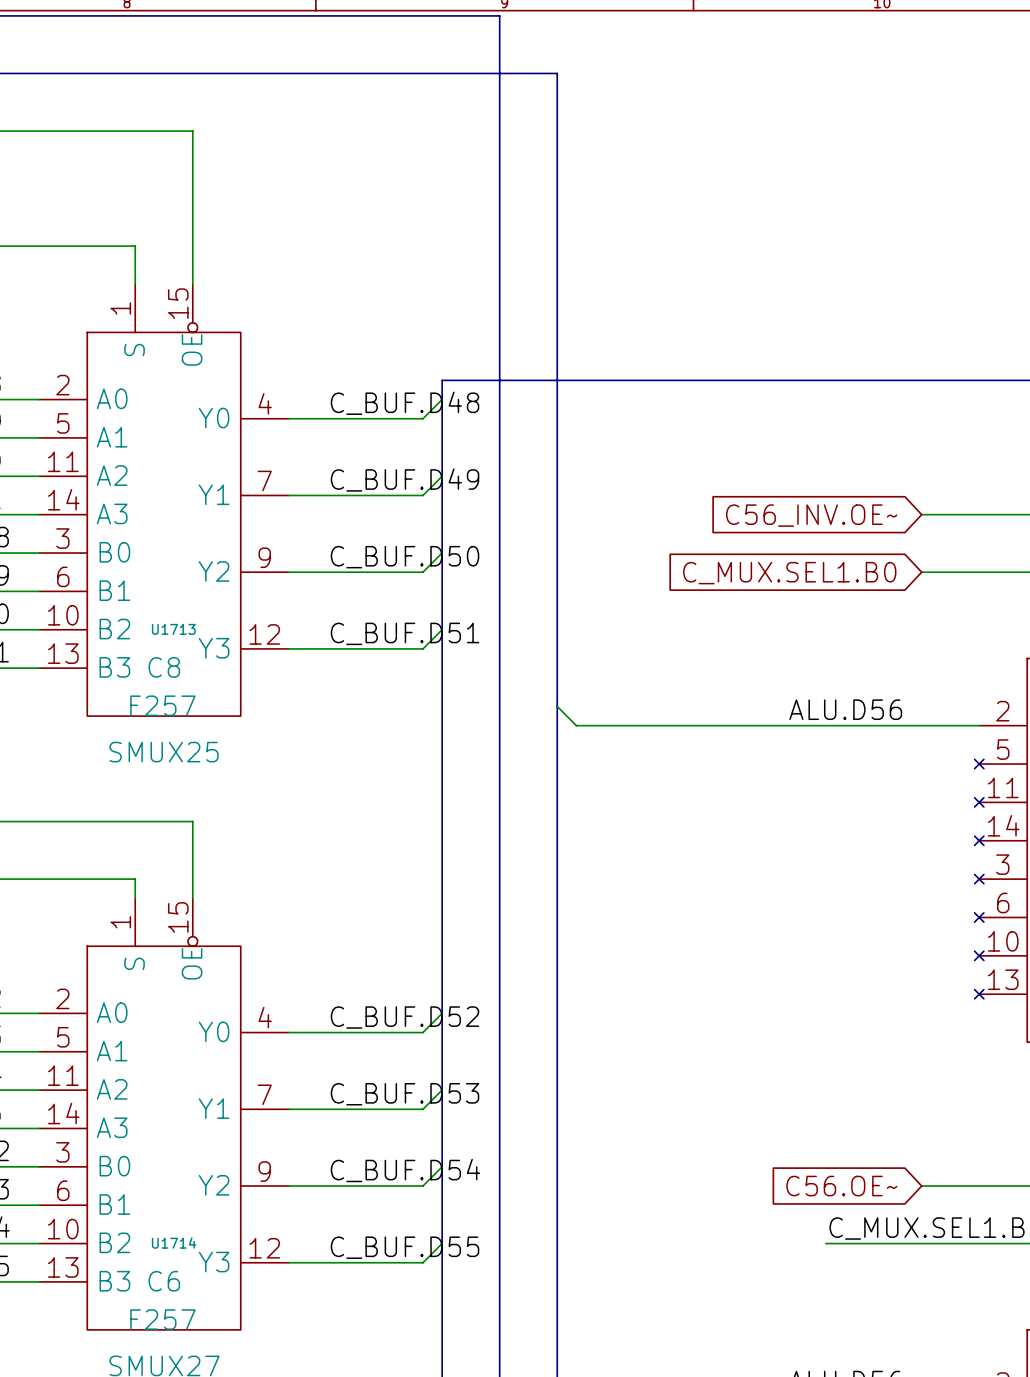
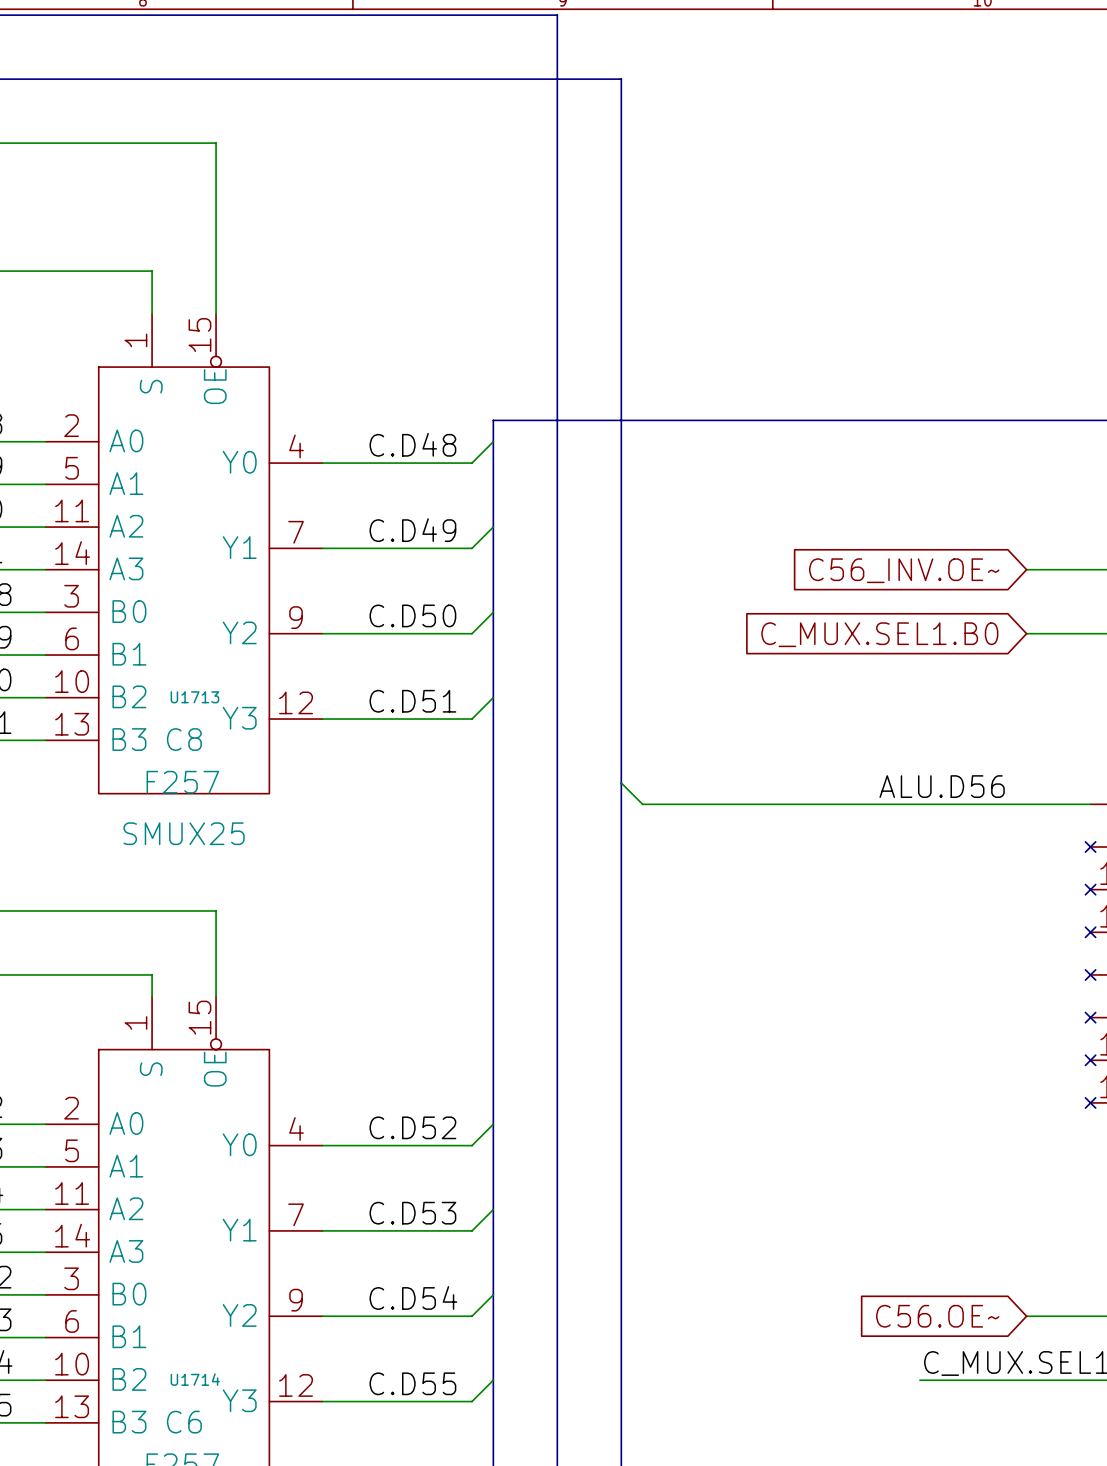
label: C_BUF.D48 (405, 403) -> C.D48 (412, 444)
label: C_BUF.D49 (405, 479) -> C.D49 (412, 530)
label: C_BUF.D50 (405, 557) -> C.D50 (412, 615)
label: C_BUF.D51 (405, 633) -> C.D51 (412, 701)
label: C_BUF.D52 (405, 1017) -> C.D52 (412, 1127)
label: C_BUF.D53 (405, 1094) -> C.D53 (412, 1213)
label: C_BUF.D54 (405, 1170) -> C.D54 (413, 1297)
label: C_BUF.D55 (405, 1247) -> C.D55 (412, 1383)

